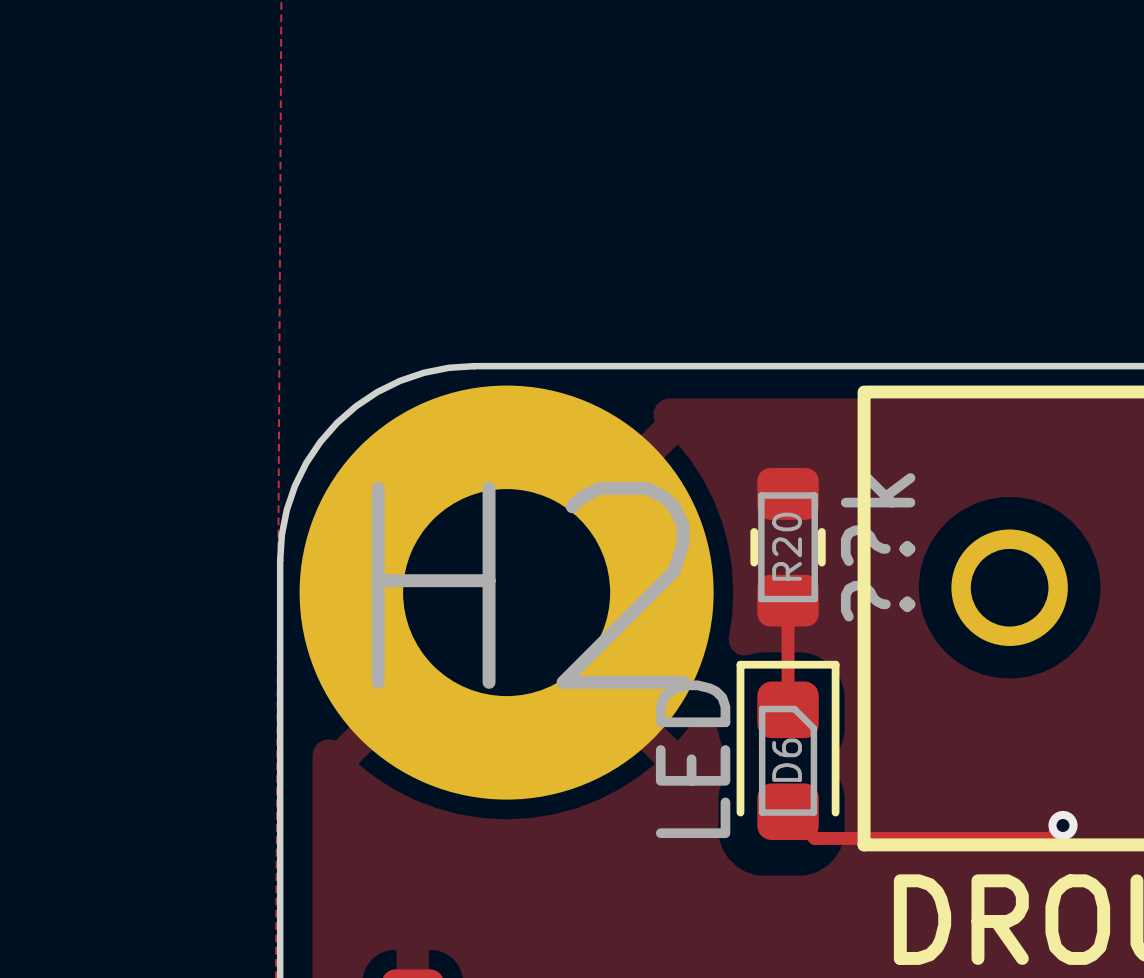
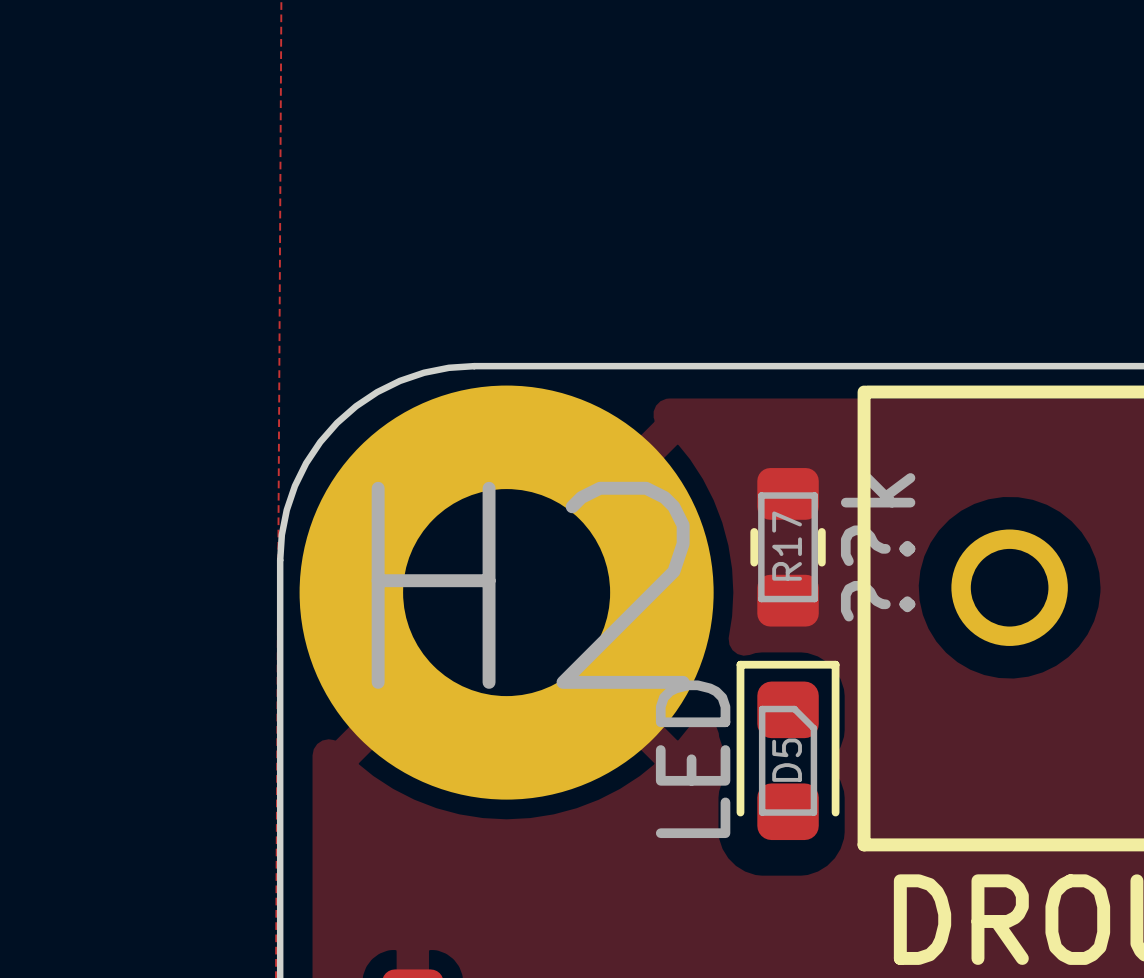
R20 name: R20 (787, 546) -> R17 (787, 546)
track: (788, 600) (788, 709) -> none
D6 name: D6 (787, 760) -> D5 (787, 760)
track: (788, 811) (814, 838) (1050, 838) (1063, 825) -> none
via: (1063, 825) -> none

